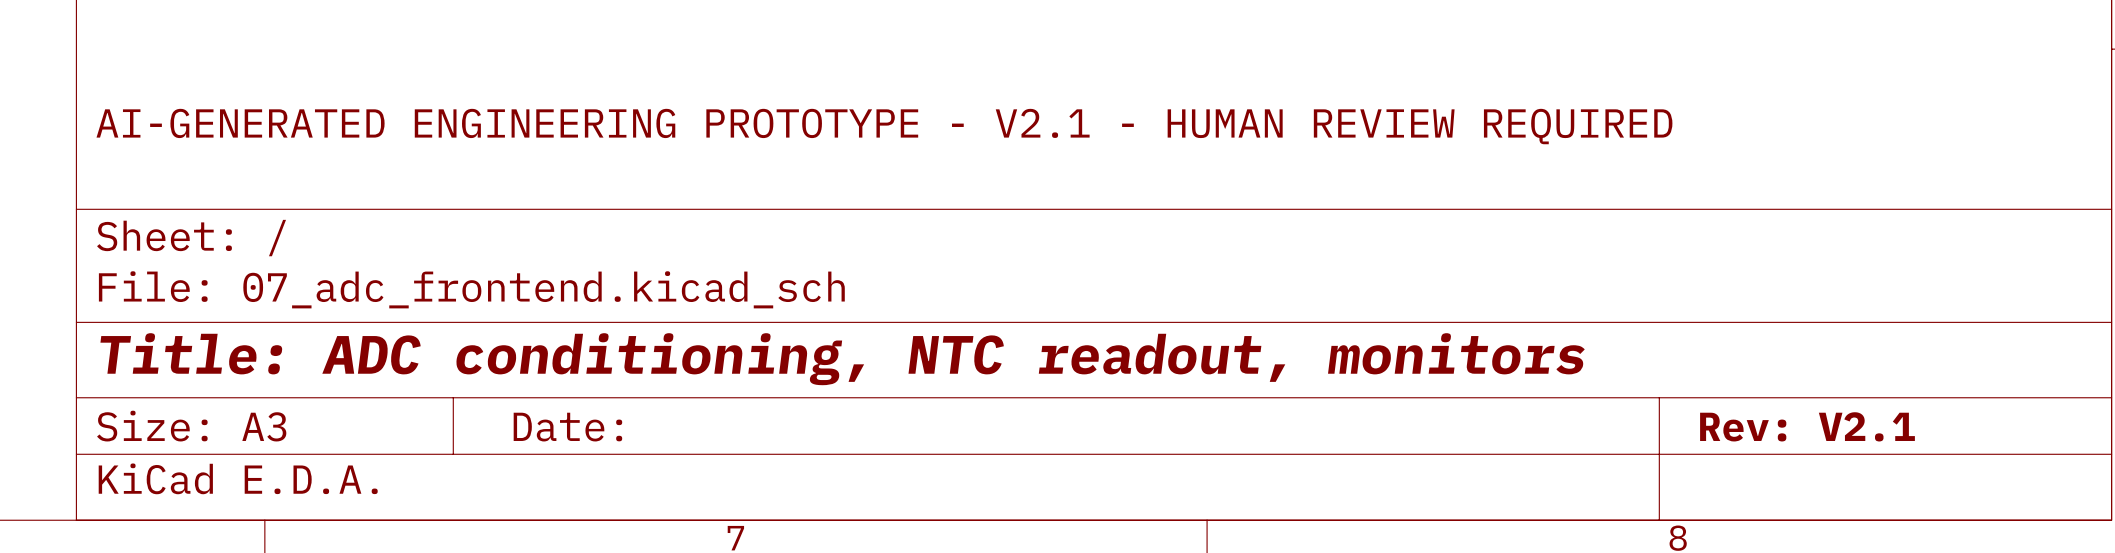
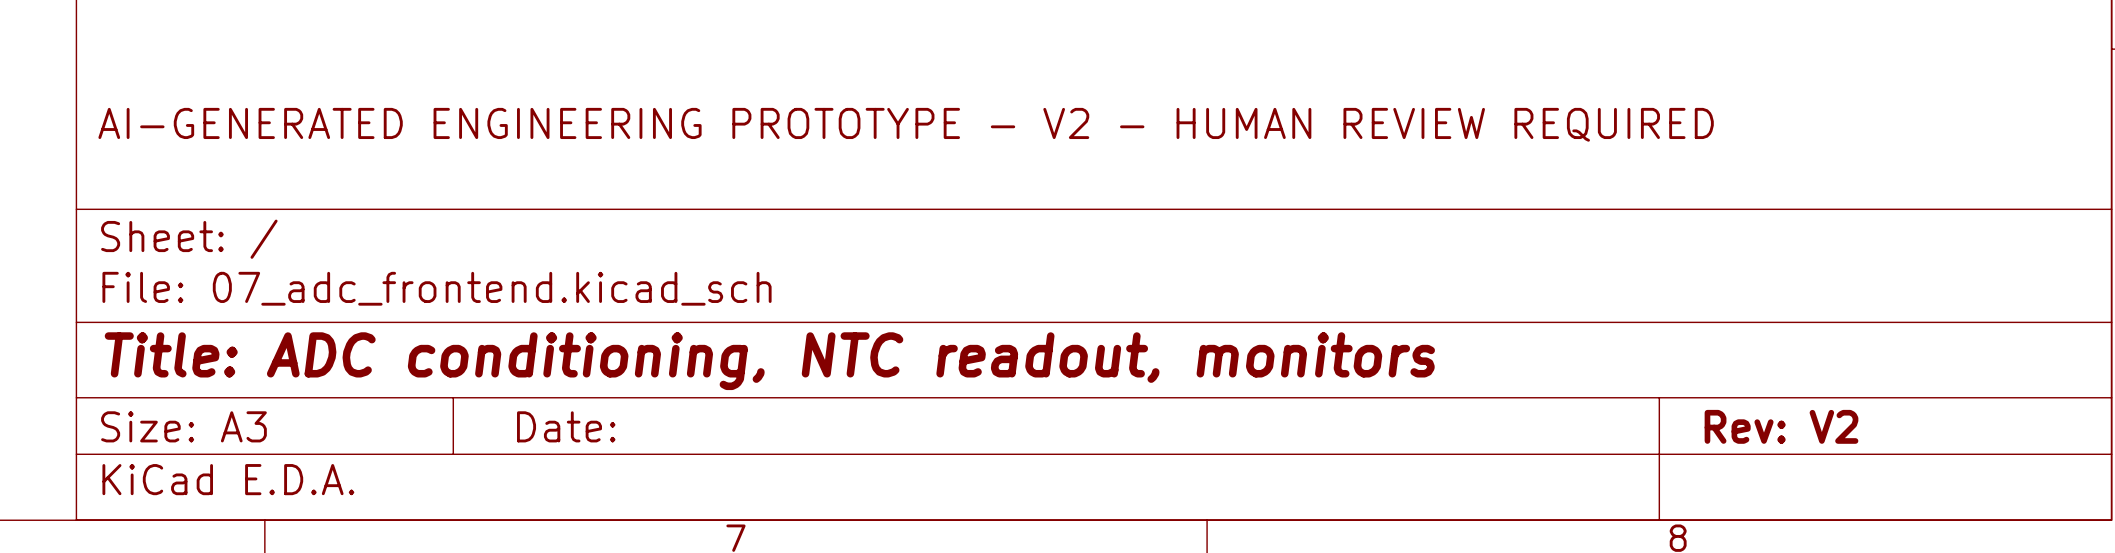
title block: AI-GENERATED ENGINEERING PROTOTYPE - V2.1 - HUMAN REVIEW REQUIRED (884, 126) -> AI-GENERATED ENGINEERING PROTOTYPE - V2 - HUMAN REVIEW REQUIRED (906, 124)
title block: Rev: V2.1 (1807, 426) -> Rev: V2 (1781, 426)

